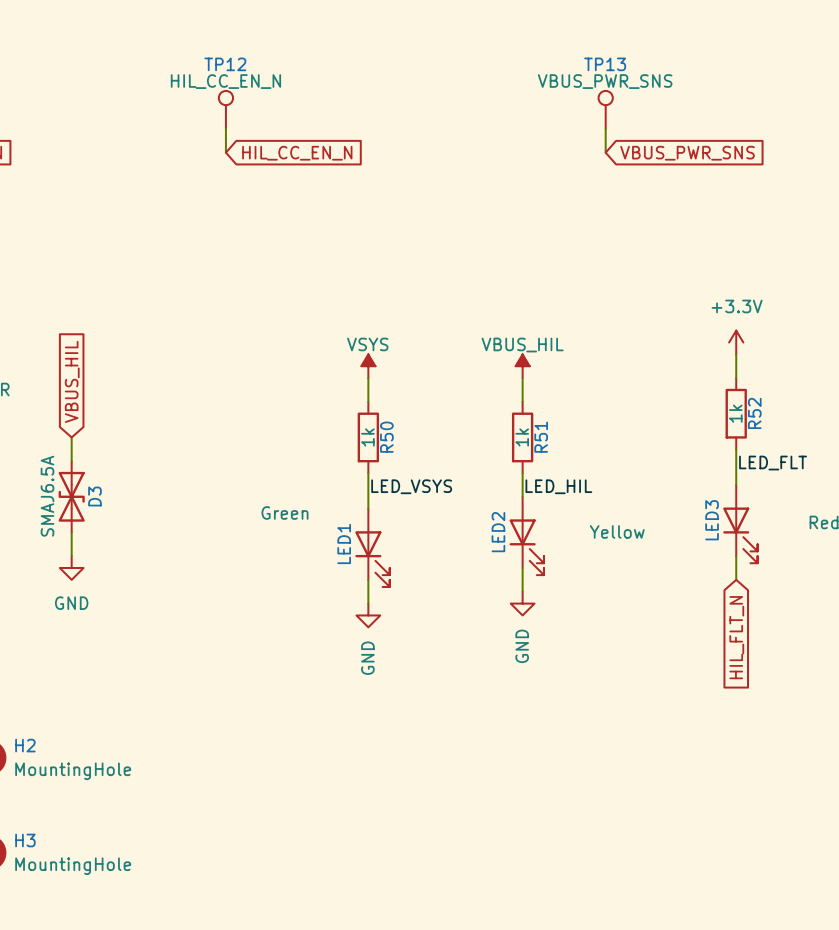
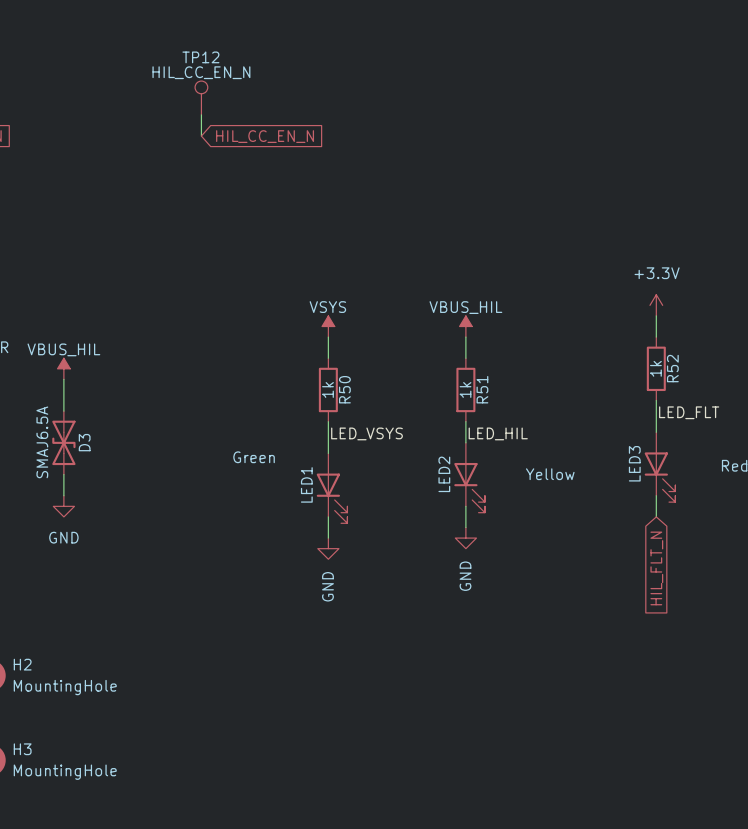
TP13: VBUS_PWR_SNS (605, 109) -> none
wire: (605, 128) (605, 152) -> none
global label: VBUS_PWR_SNS (687, 153) -> none
global label: VBUS_HIL (72, 381) -> none
power symbol: none -> VBUS_HIL (63, 368)
wire: none -> (63, 379) (63, 389)

